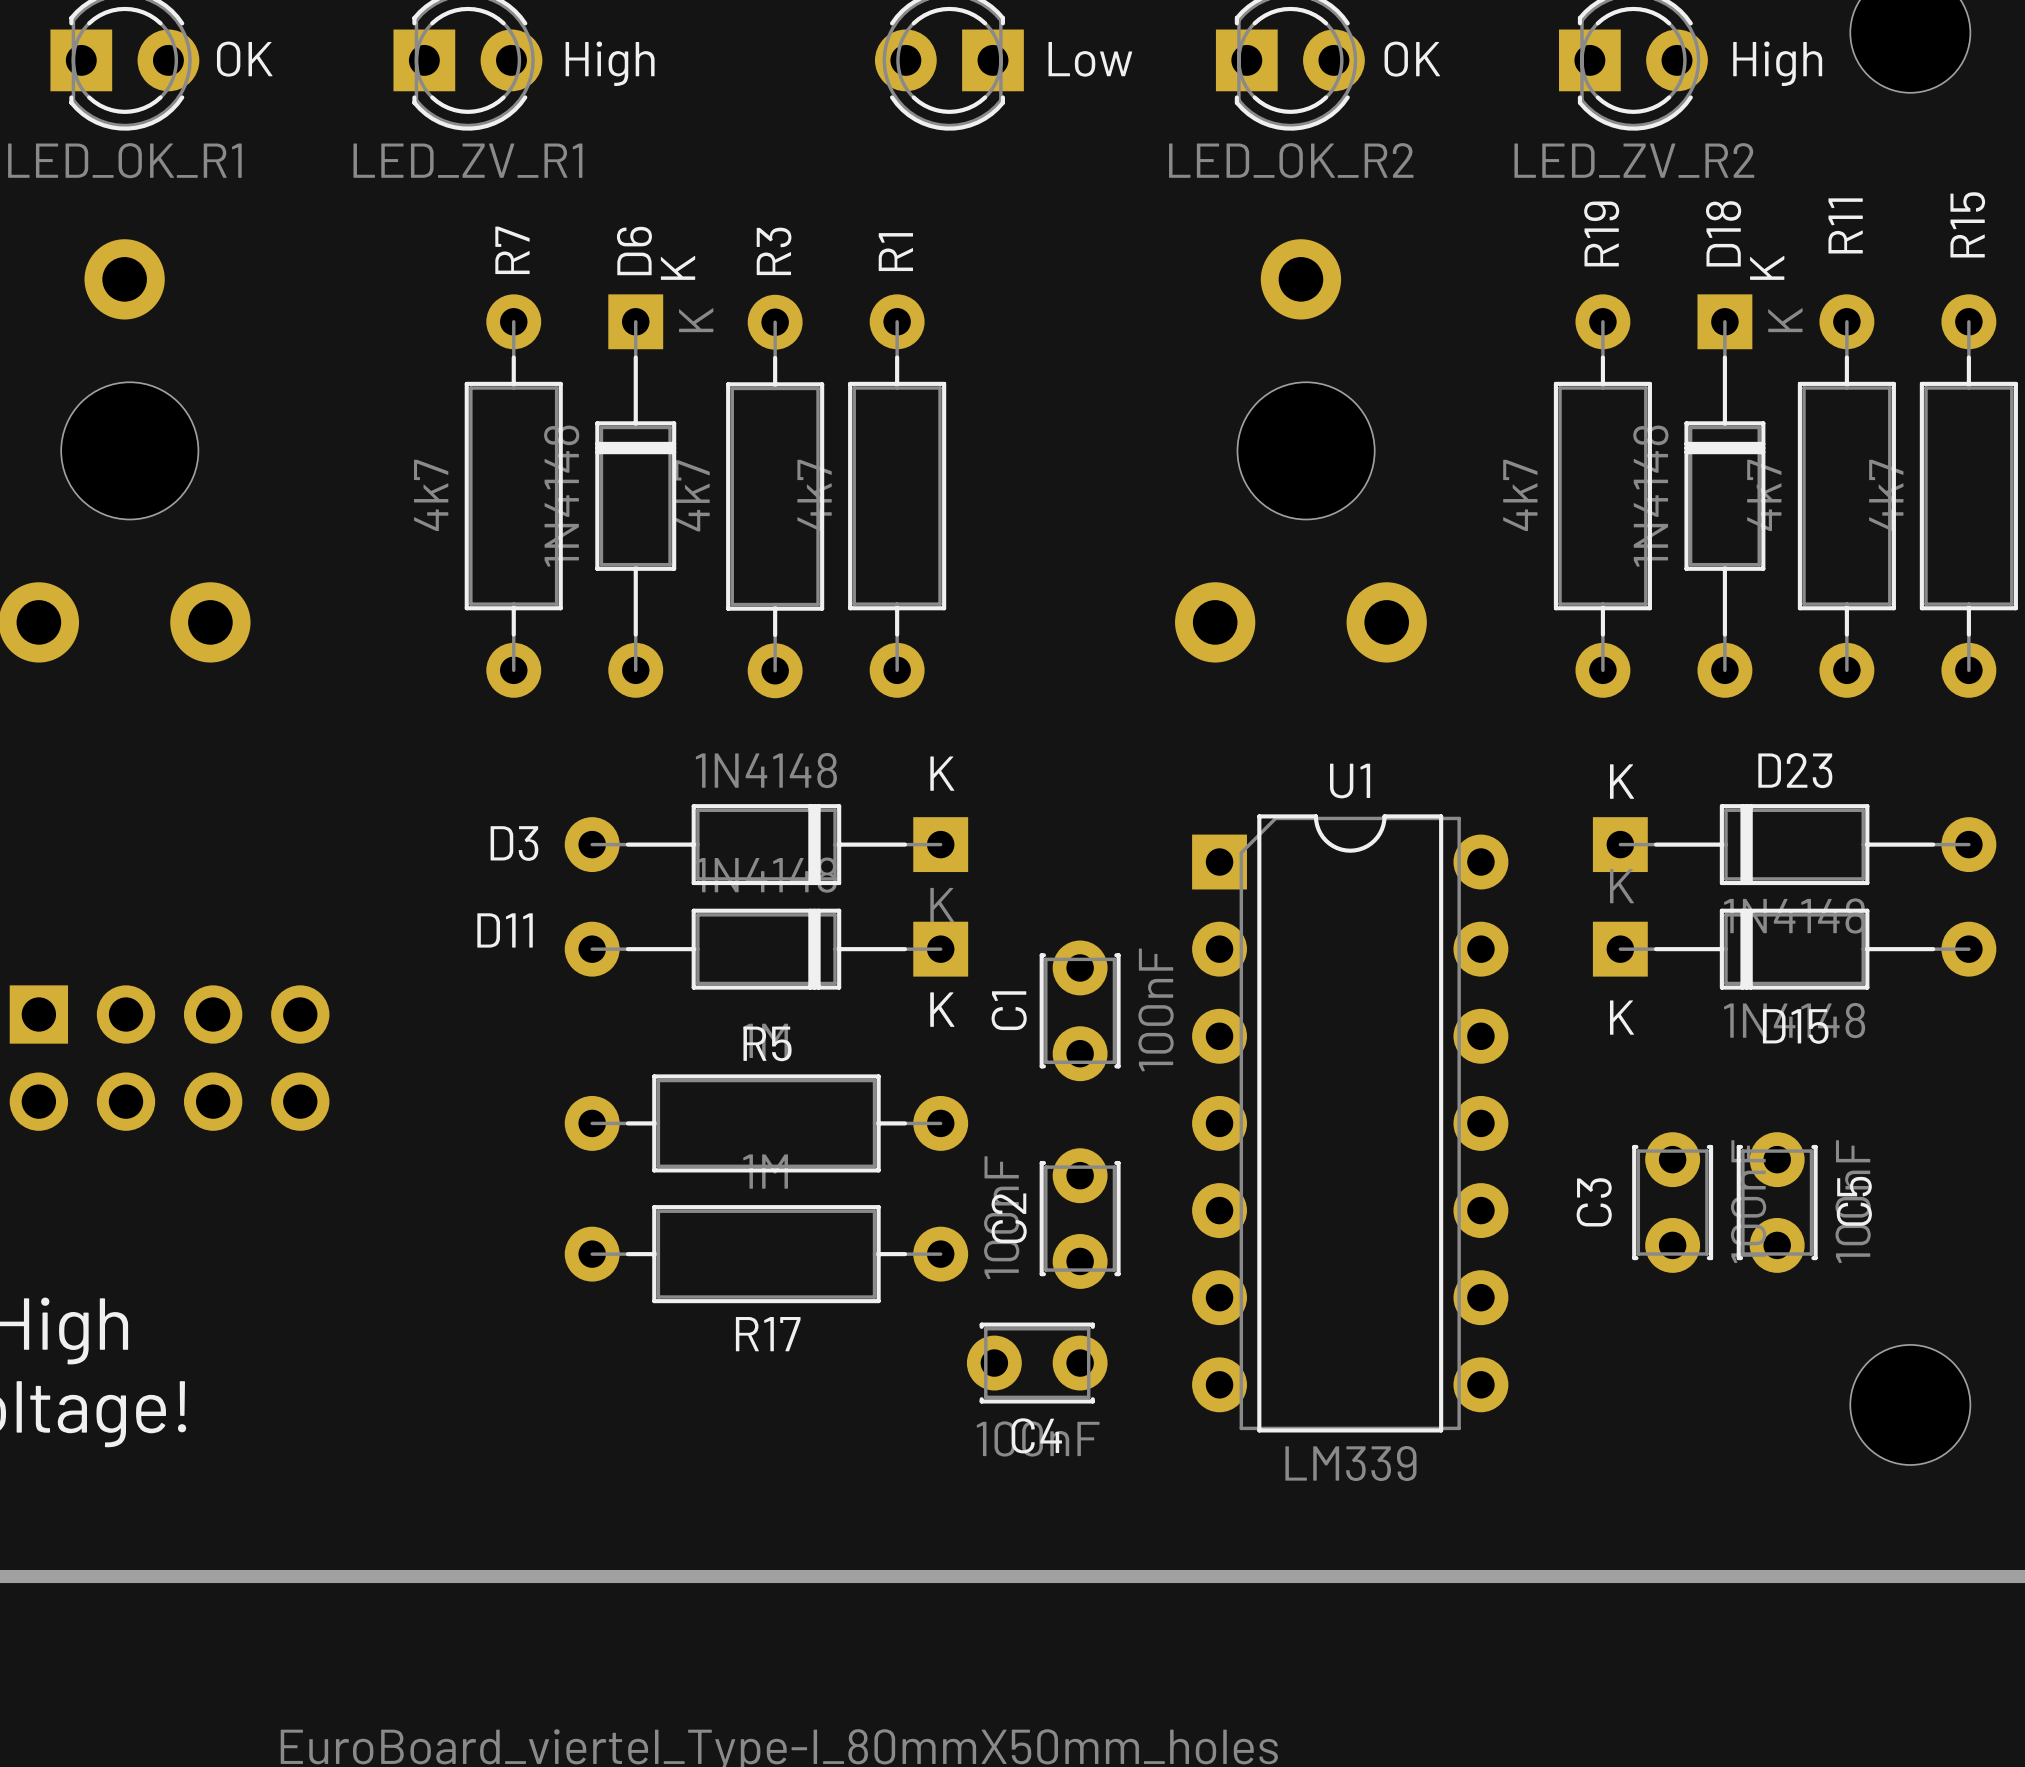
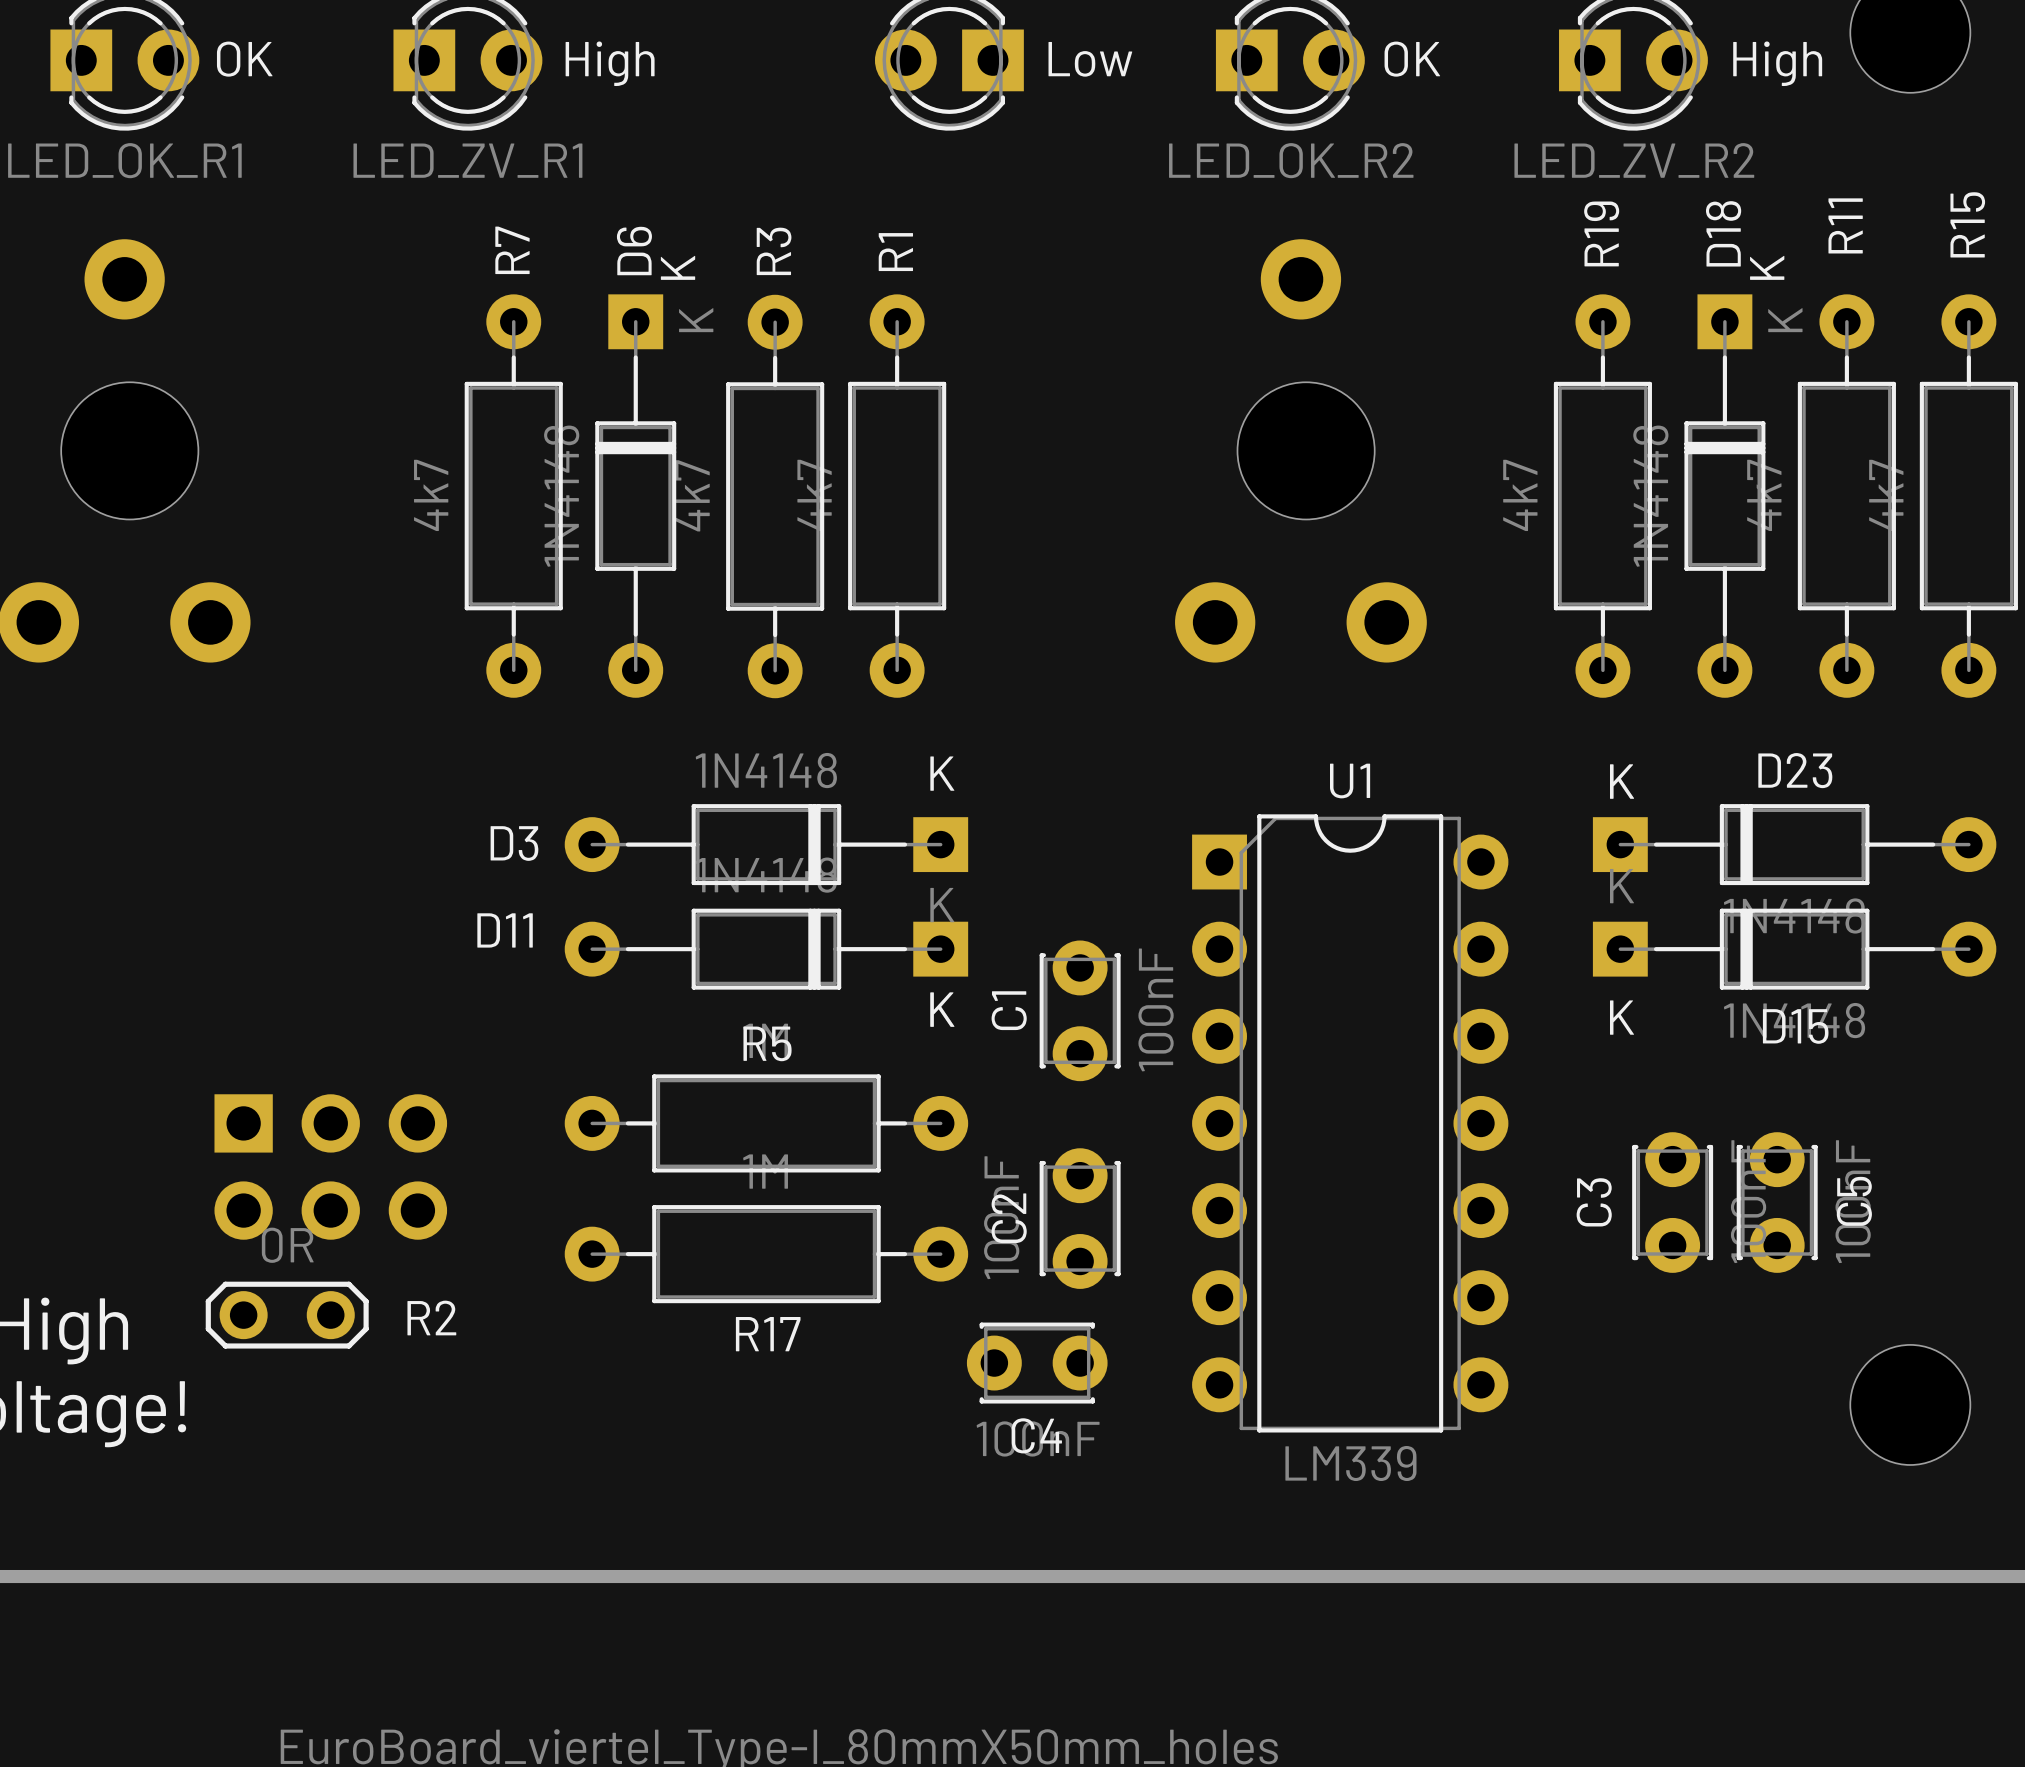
part: (169, 1058) -> none
part: none -> (330, 1166)
R2: none -> 0R (287, 1315)

